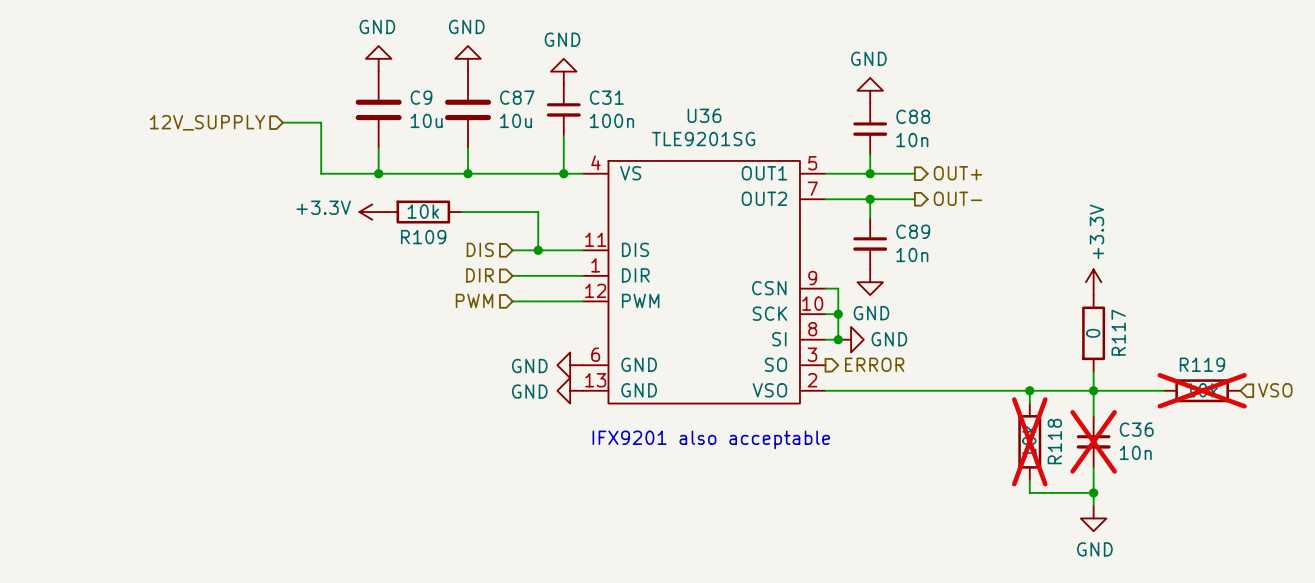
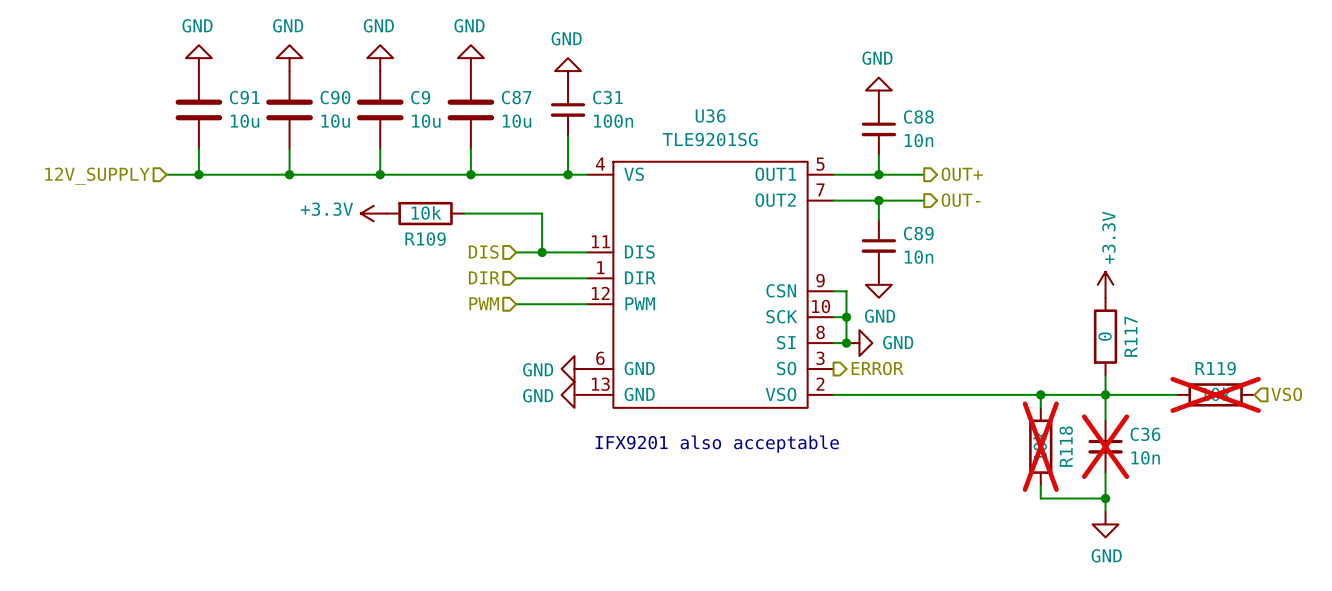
power symbol: none -> GND (198, 58)
power symbol: none -> GND (289, 58)
C91: none -> 10u (198, 109)
C90: none -> 10u (289, 109)
hierarchical label position: 12V_SUPPLY (207, 122) -> 12V_SUPPLY (97, 176)
wire: (282, 122) (321, 122) (321, 173) -> (166, 174) (321, 174)
wire: none -> (198, 148) (198, 174)
wire: none -> (289, 148) (289, 174)
junction: none -> (198, 174)
junction: none -> (289, 174)

